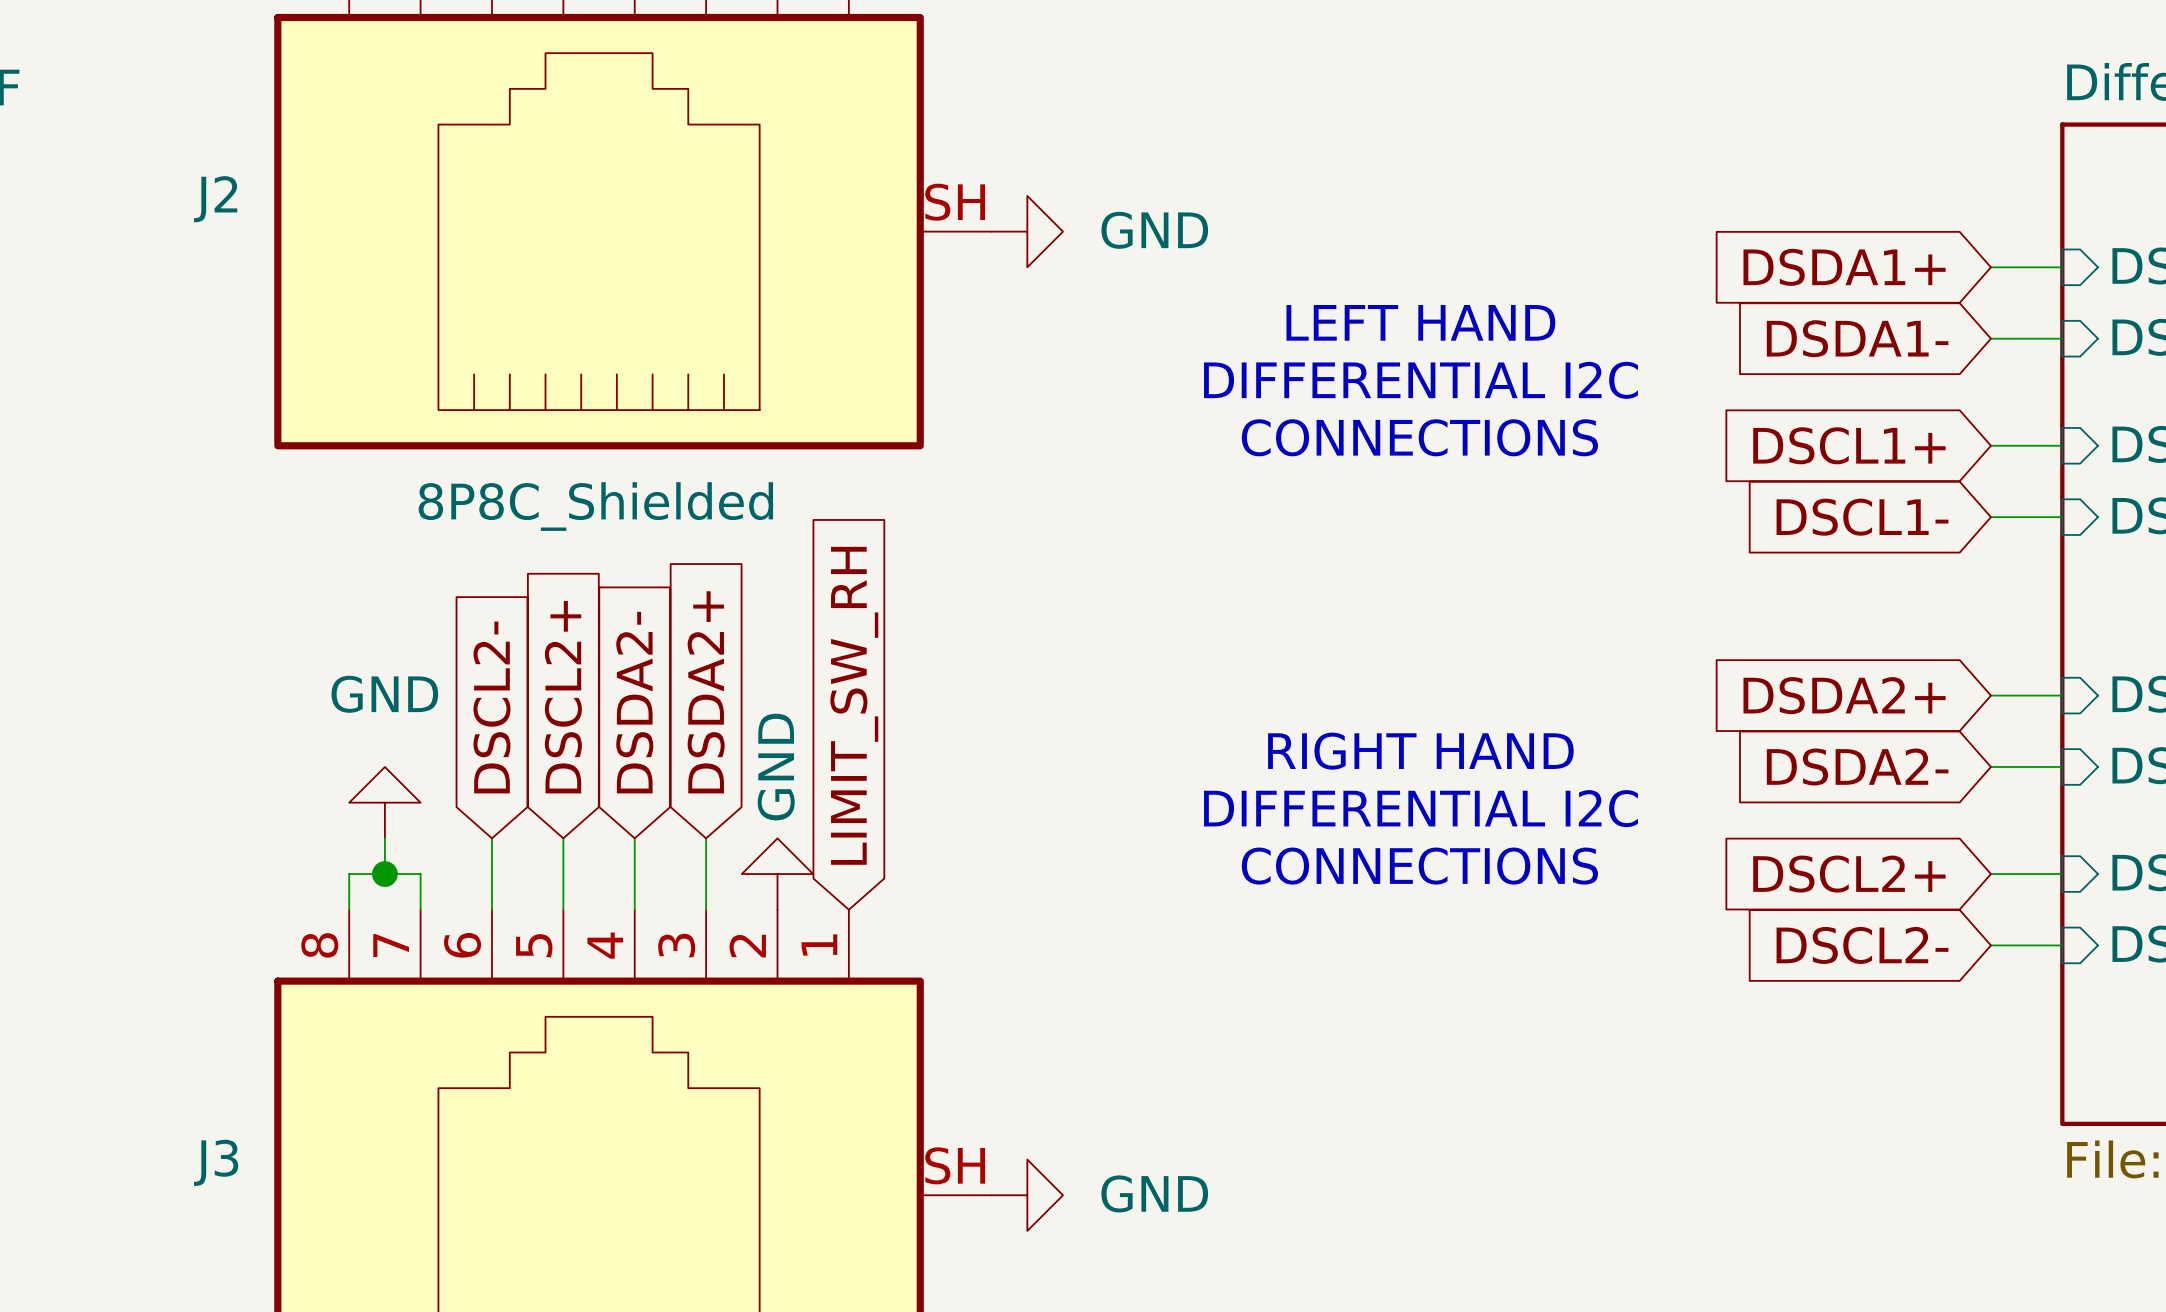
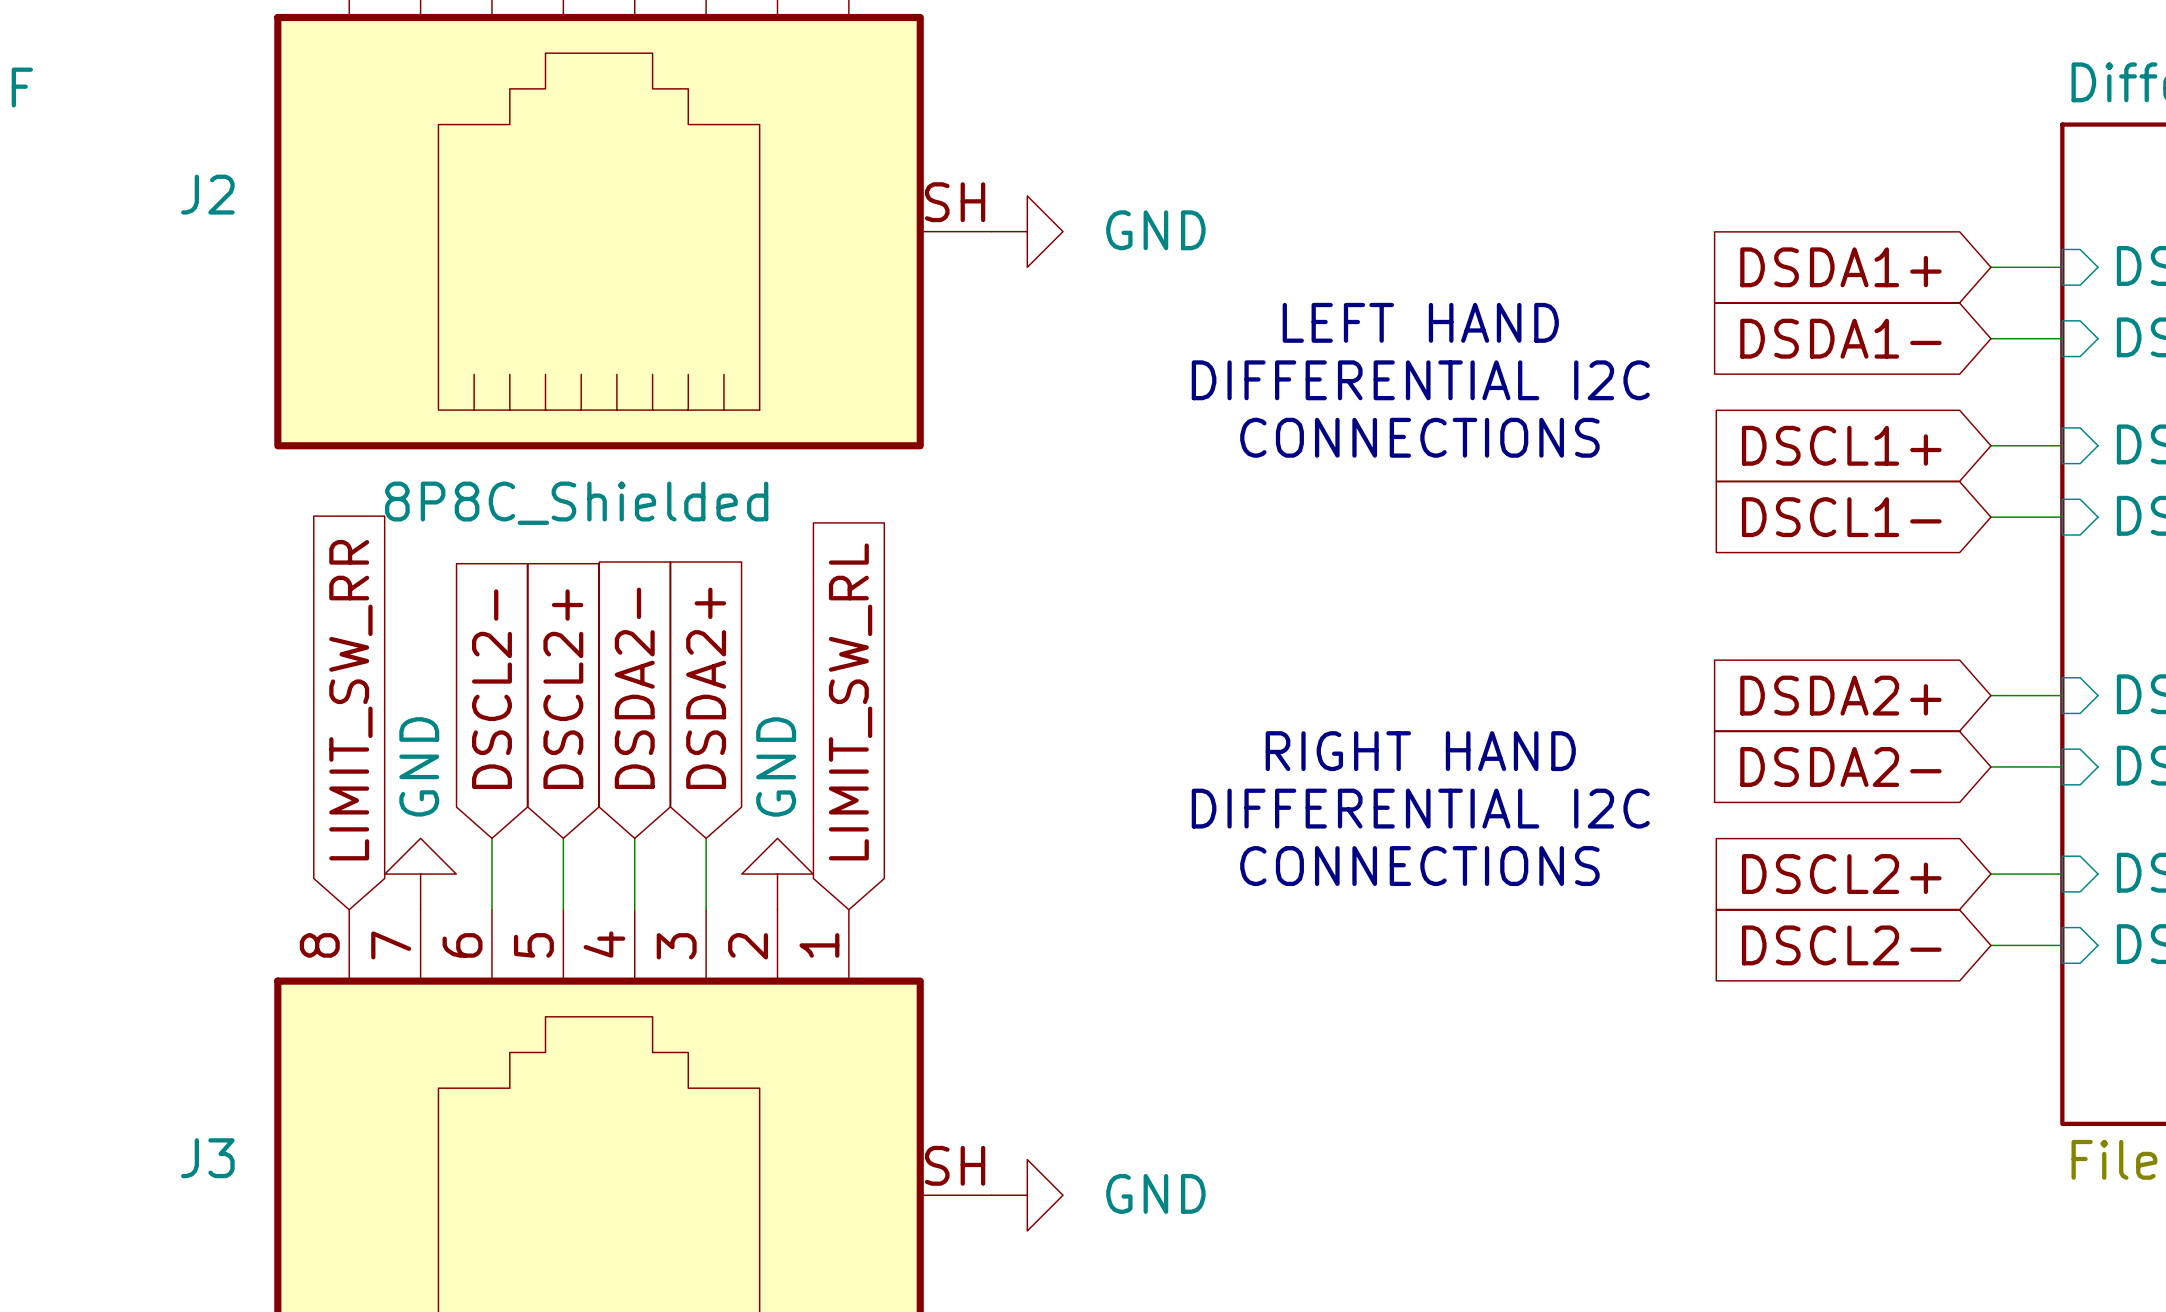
power symbol text rotation: 0° (384, 694) -> 90° counterclockwise (419, 766)
global label: none -> LIMIT_SW_RR (350, 700)
global label: LIMIT_SW_RH (854, 705) -> LIMIT_SW_RL (850, 701)
power symbol position: GND (384, 802) -> GND (420, 874)
junction: (384, 874) -> none
wire: (349, 909) (349, 874) (420, 874) (420, 909) -> none

